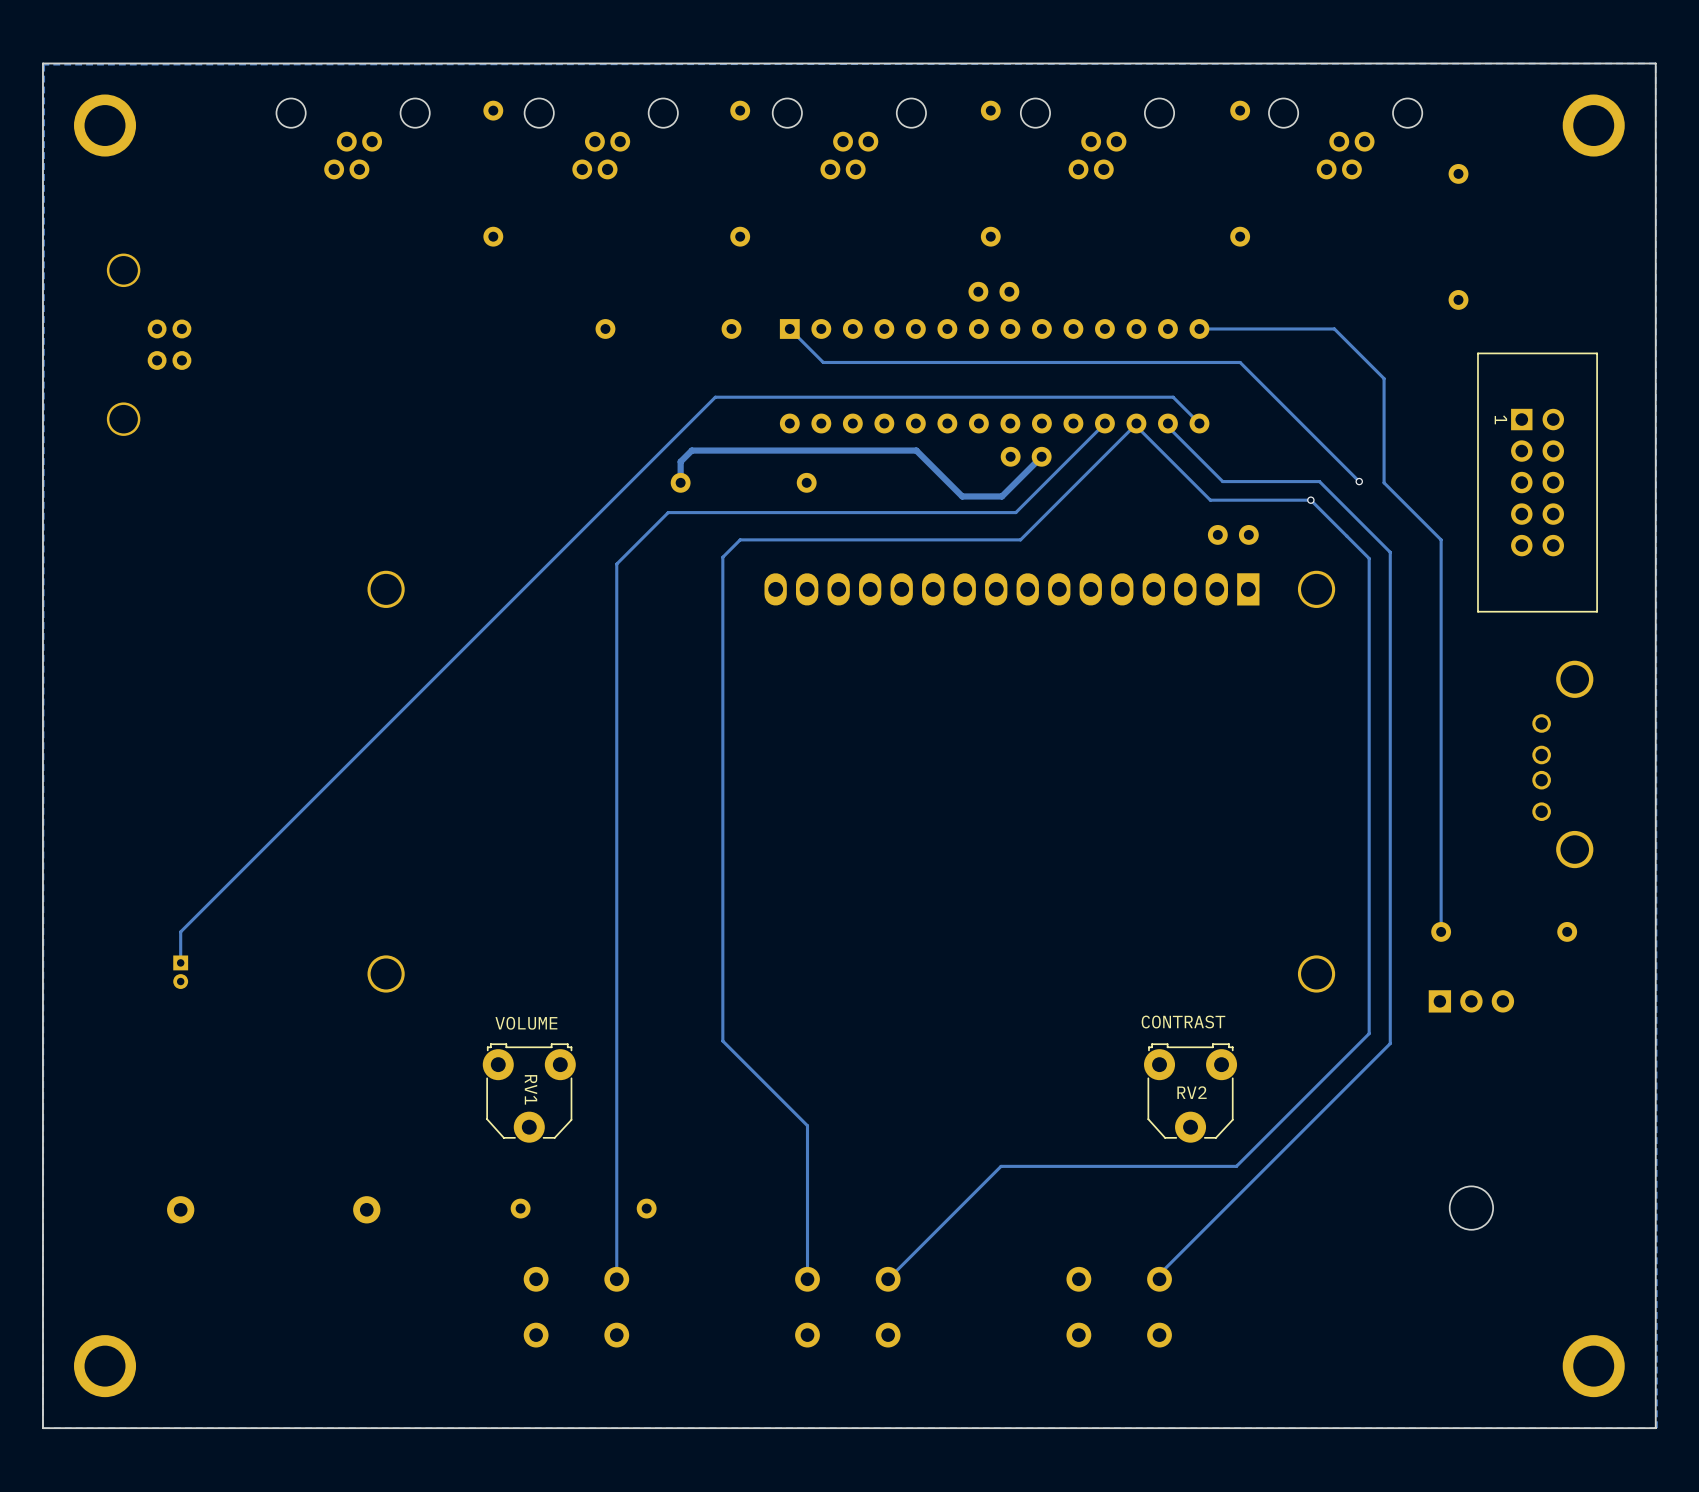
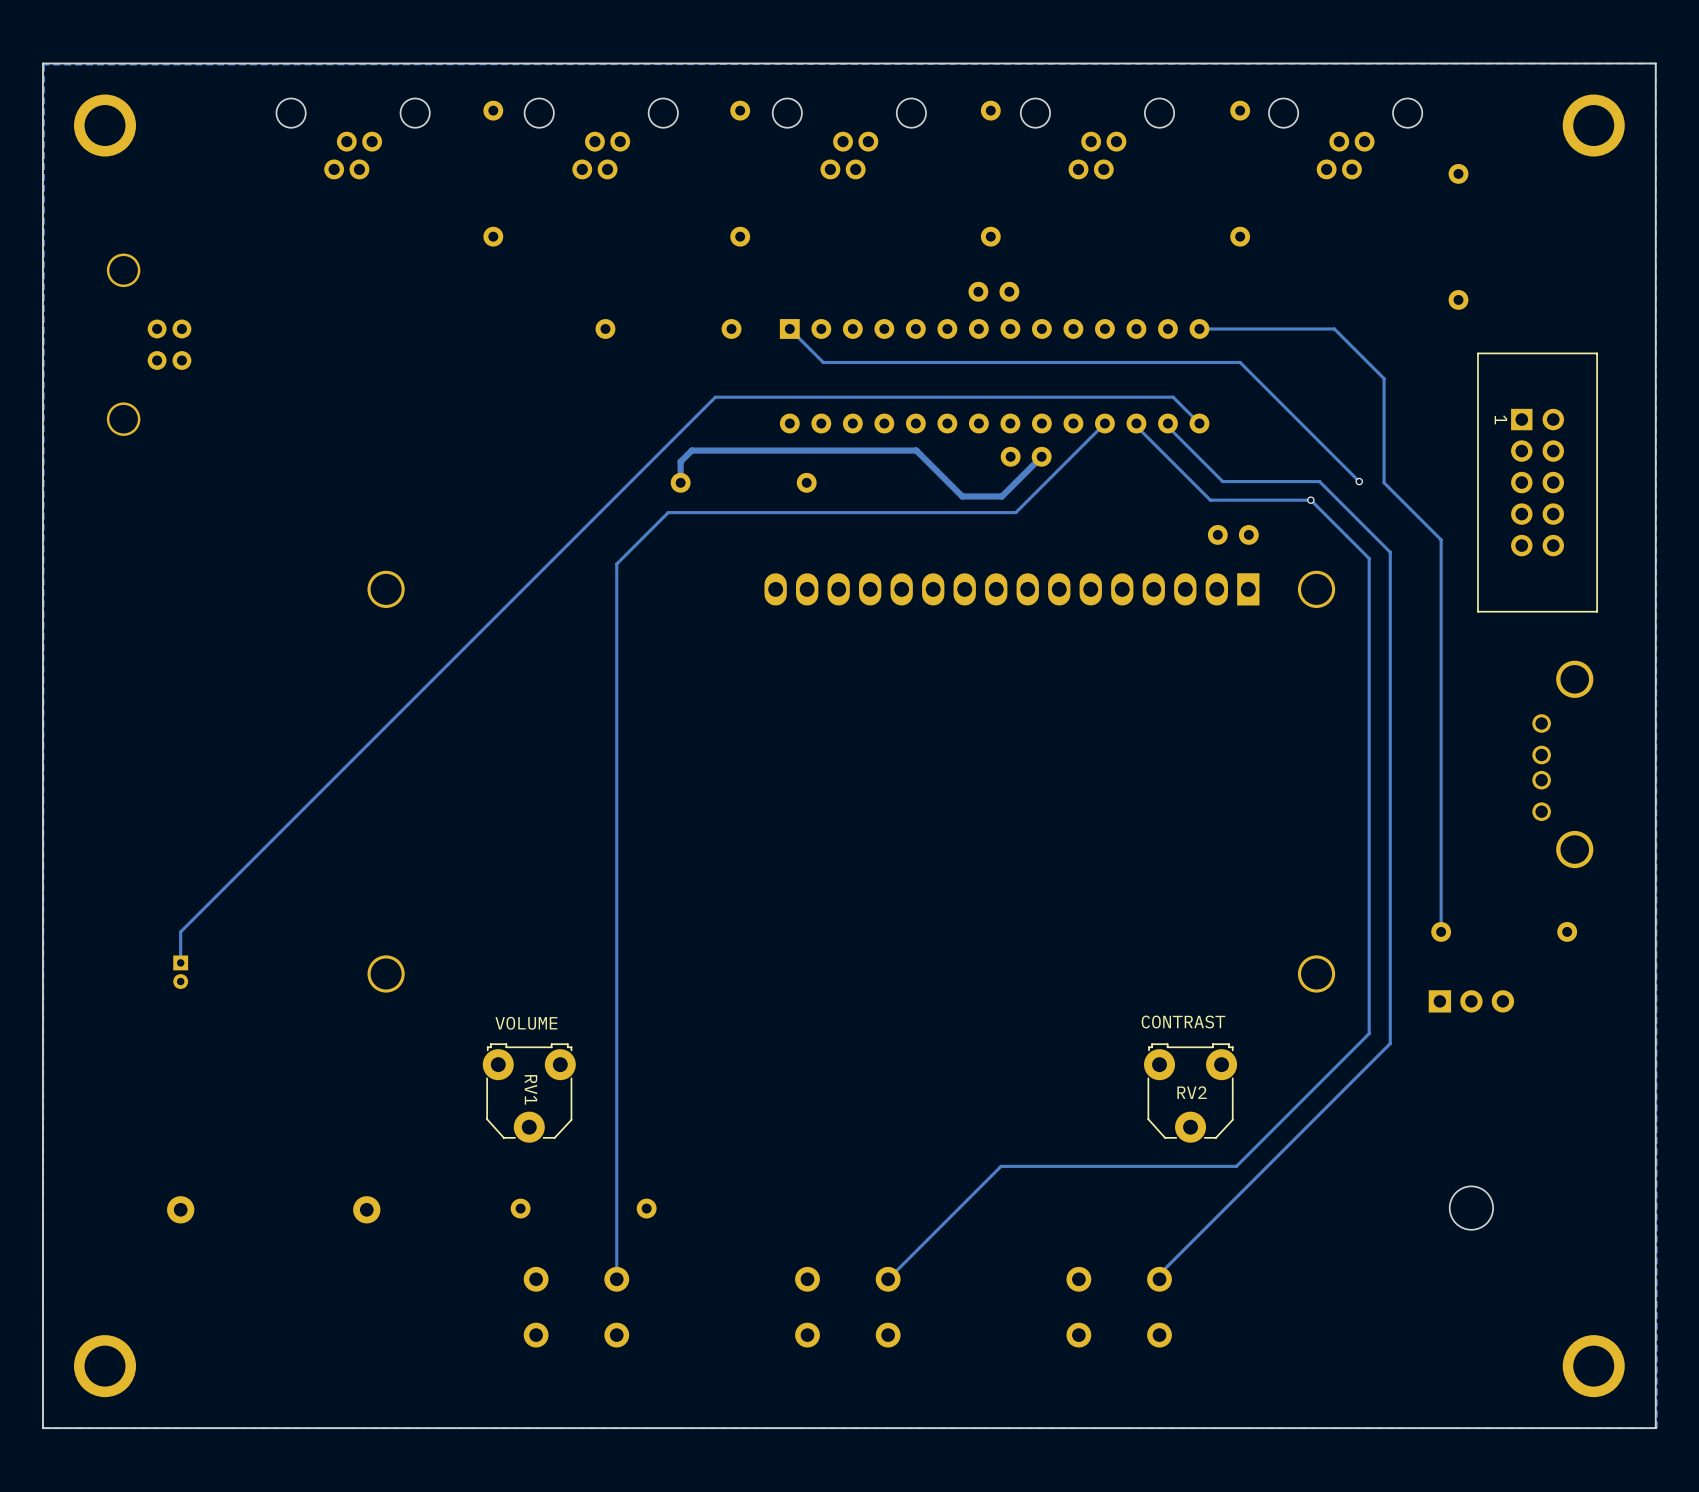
track: (1136, 424) (1020, 539) (740, 539) (722, 557) (722, 1041) (807, 1125) (807, 1279) -> none

